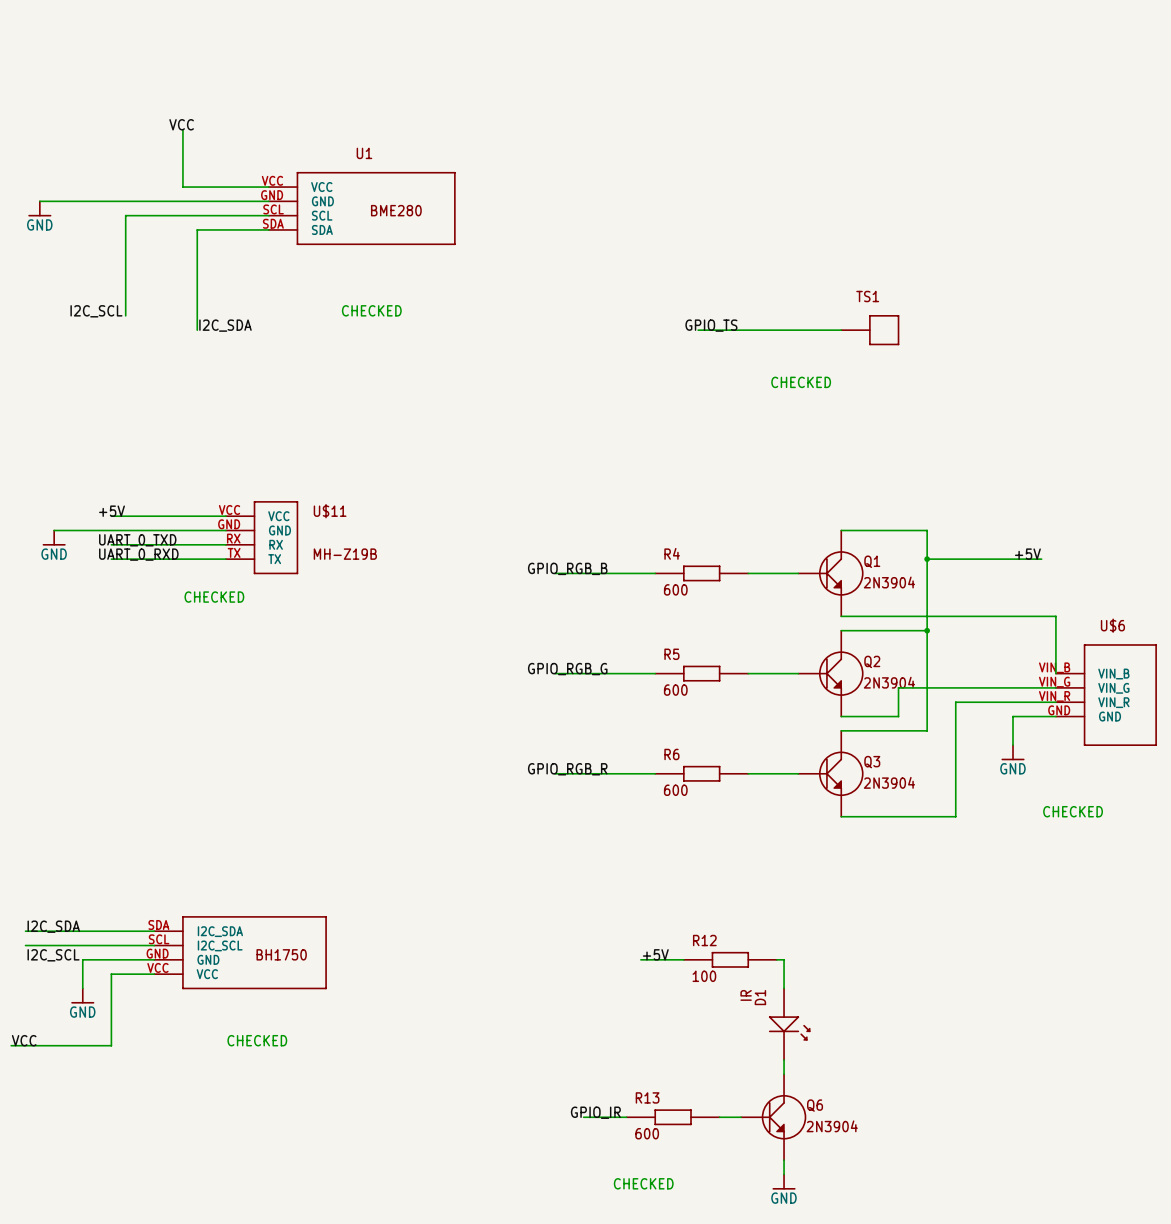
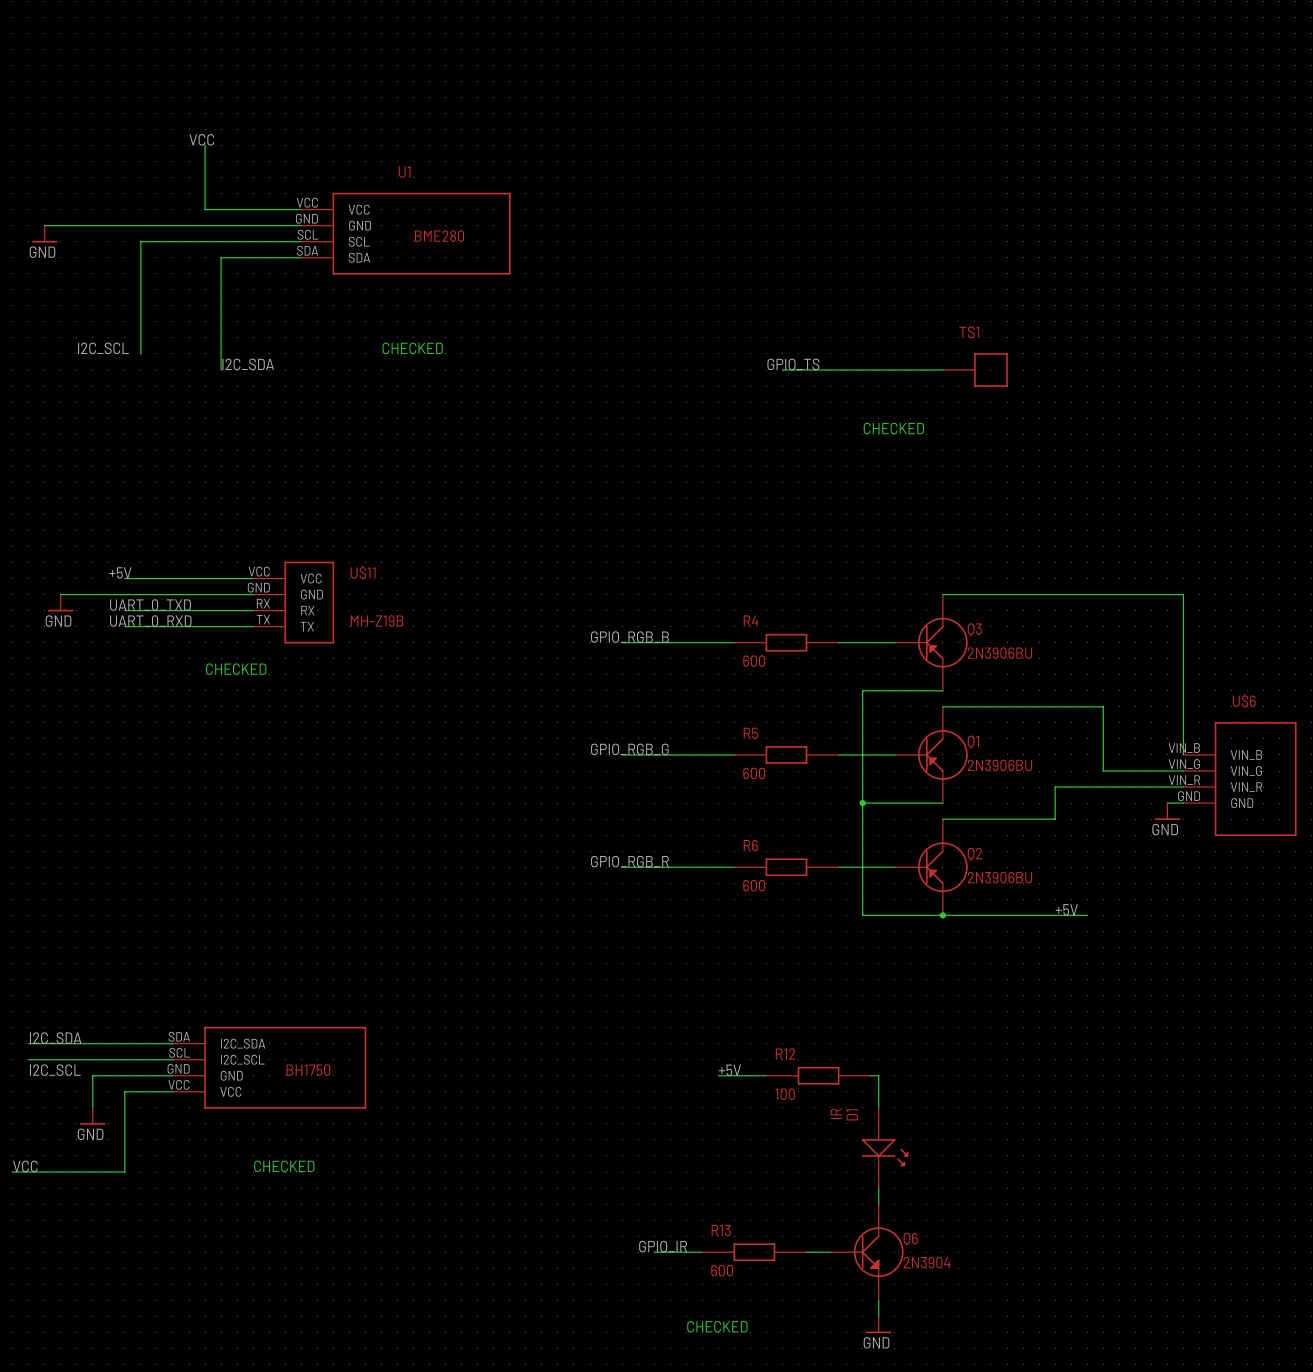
Q1 symbol: [798, 530, 864, 617] -> [894, 706, 968, 804]
wire: (927, 530) (927, 730) -> none
label: +5V (1027, 554) -> none
wire: (927, 559) (1041, 559) -> none
junction: (927, 559) -> none
Q1 value: 2N3904 (889, 582) -> 2N3906BU (999, 765)
wire: (841, 616) (1055, 616) -> (1039, 594) (1183, 594) (1183, 690)
wire: none -> (942, 690) (862, 690) (862, 915) (942, 915)
Q2 symbol: [798, 630, 864, 717] -> [894, 819, 968, 916]
junction: (927, 630) -> none
Q2 value: 2N3904 (889, 682) -> 2N3906BU (999, 877)
wire: (984, 687) (898, 687) (898, 716) (841, 716) -> (1103, 771) (1103, 706) (1039, 706)
wire: (955, 702) (955, 816) -> (1071, 787) (1055, 787) (1055, 819) (1039, 819)
wire: none -> (862, 803) (942, 803)
junction: none -> (862, 803)
wire: (1041, 716) (1013, 716) (1013, 745) -> none
Q3 symbol: [798, 730, 864, 817] -> [894, 594, 968, 691]
power symbol position: GND (1013, 752) -> GND (1167, 811)
Q3 value: 2N3904 (889, 782) -> 2N3906BU (999, 653)
label: none -> +5V (1066, 909)
text: CHECKED (1073, 811) -> none
junction: none -> (942, 915)
wire: none -> (1071, 915) (1087, 915)

